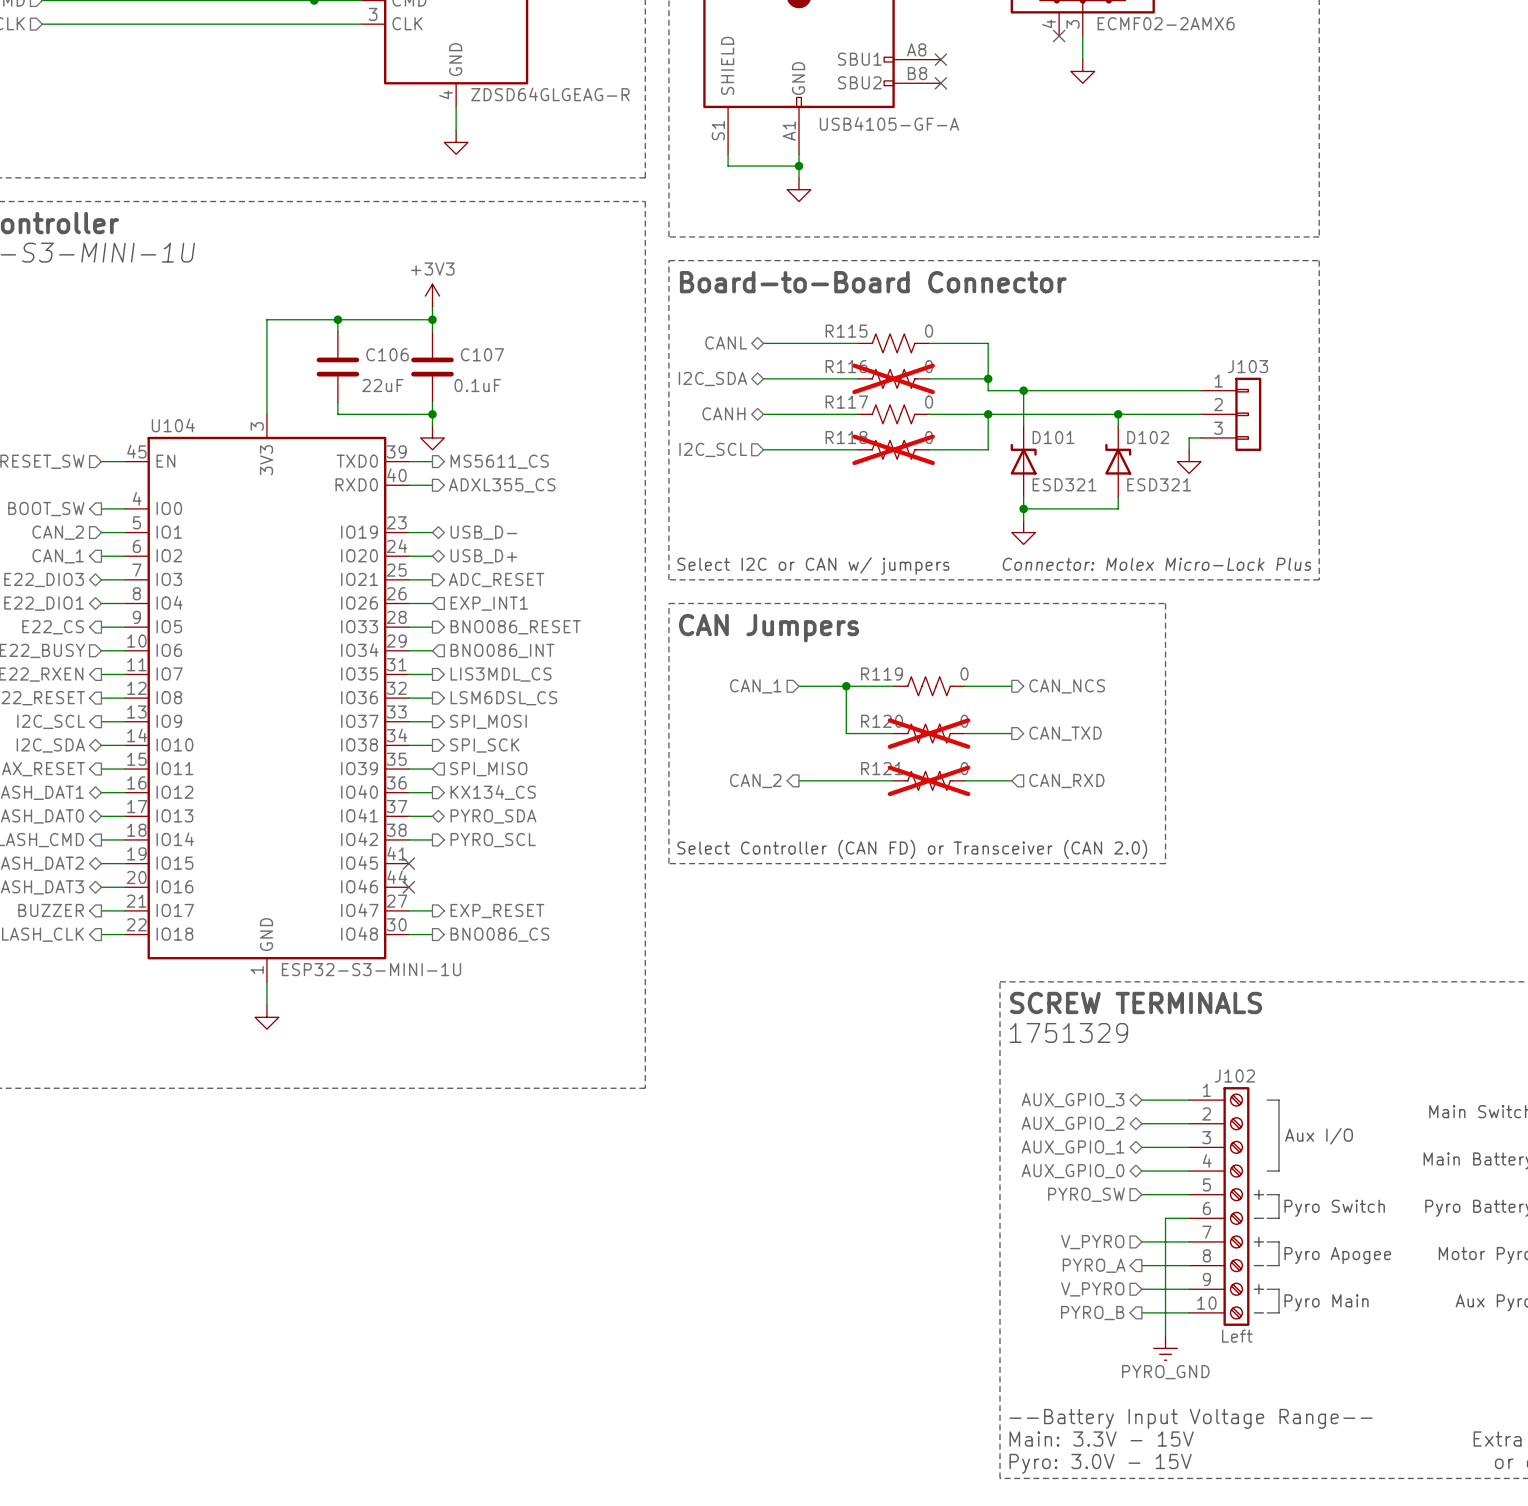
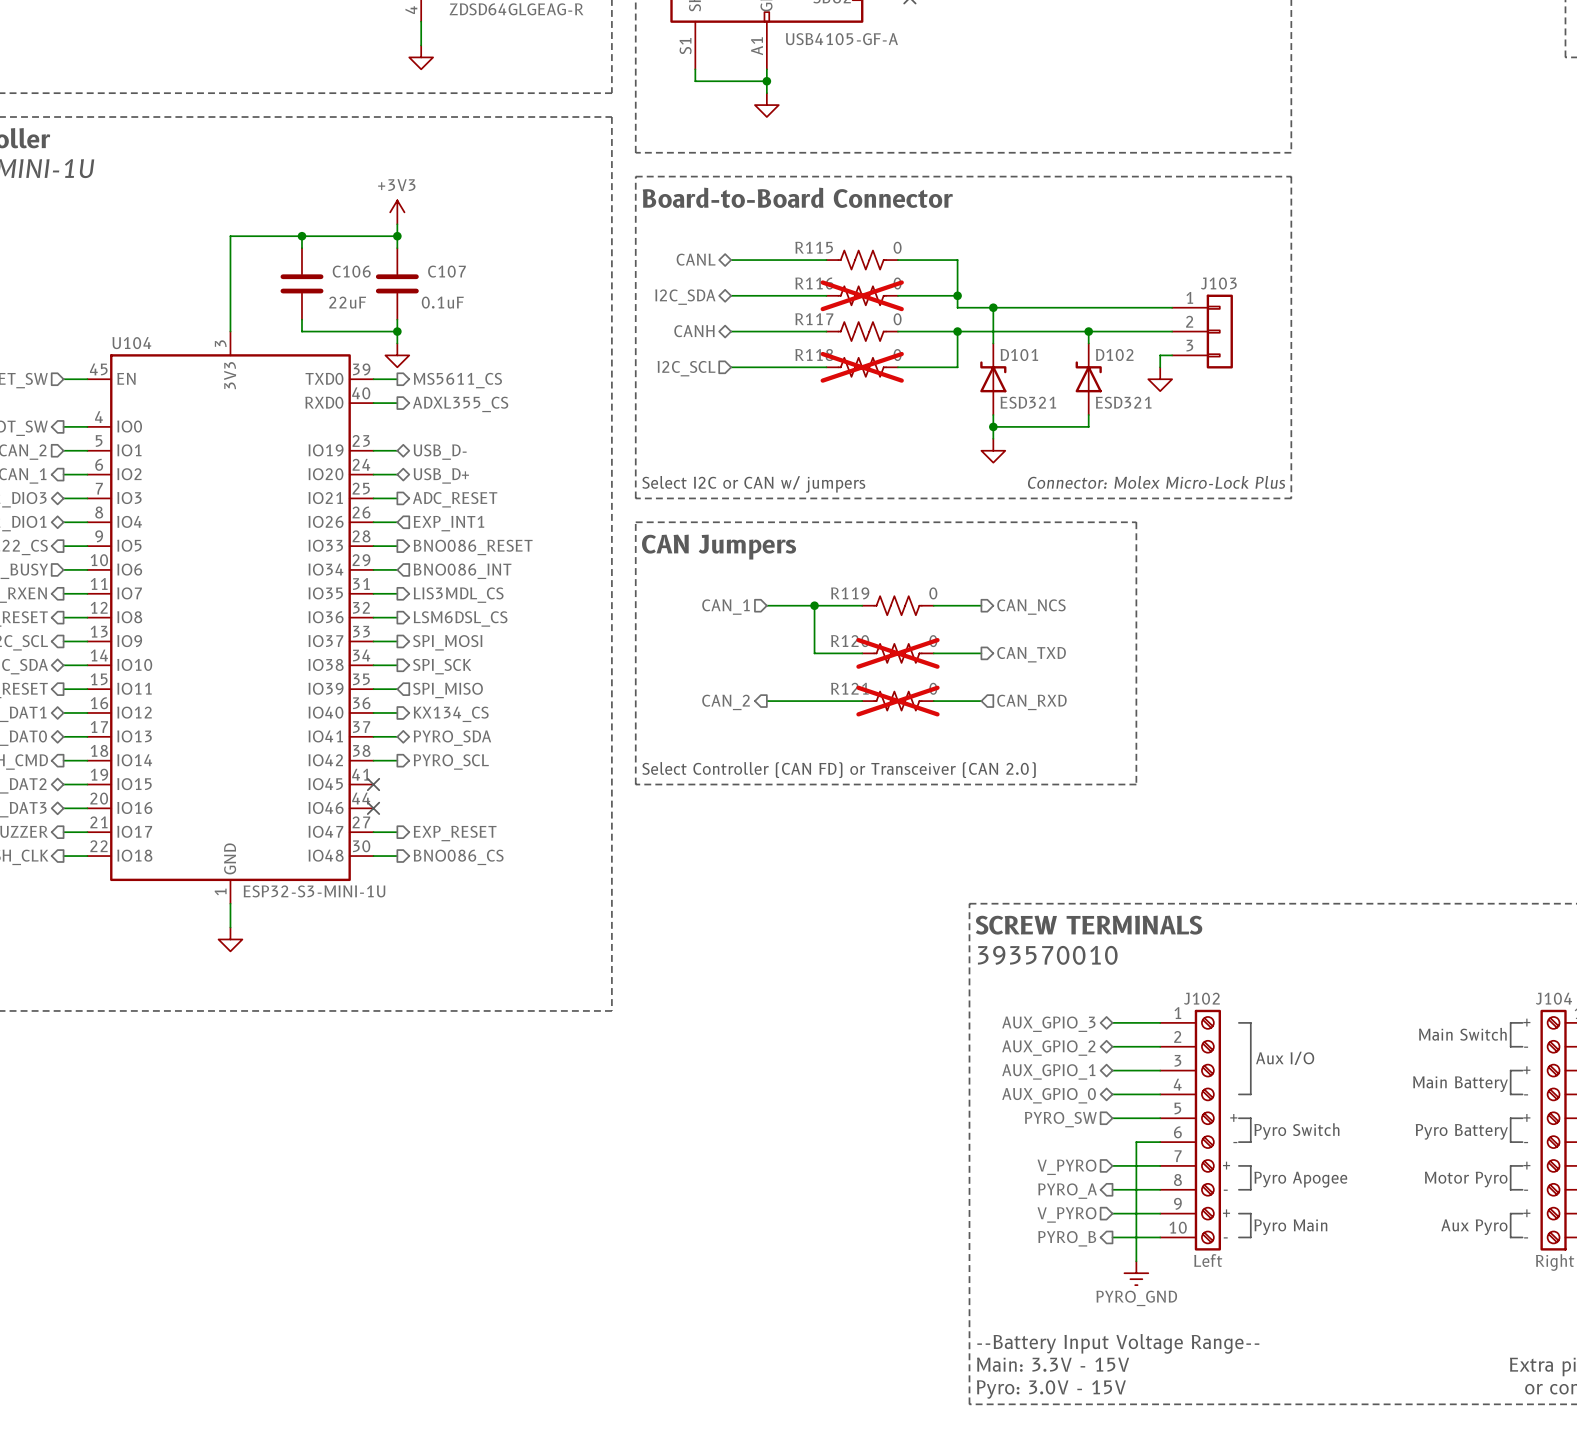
text: 1751329 (1068, 1032) -> 393570010 (1047, 955)

